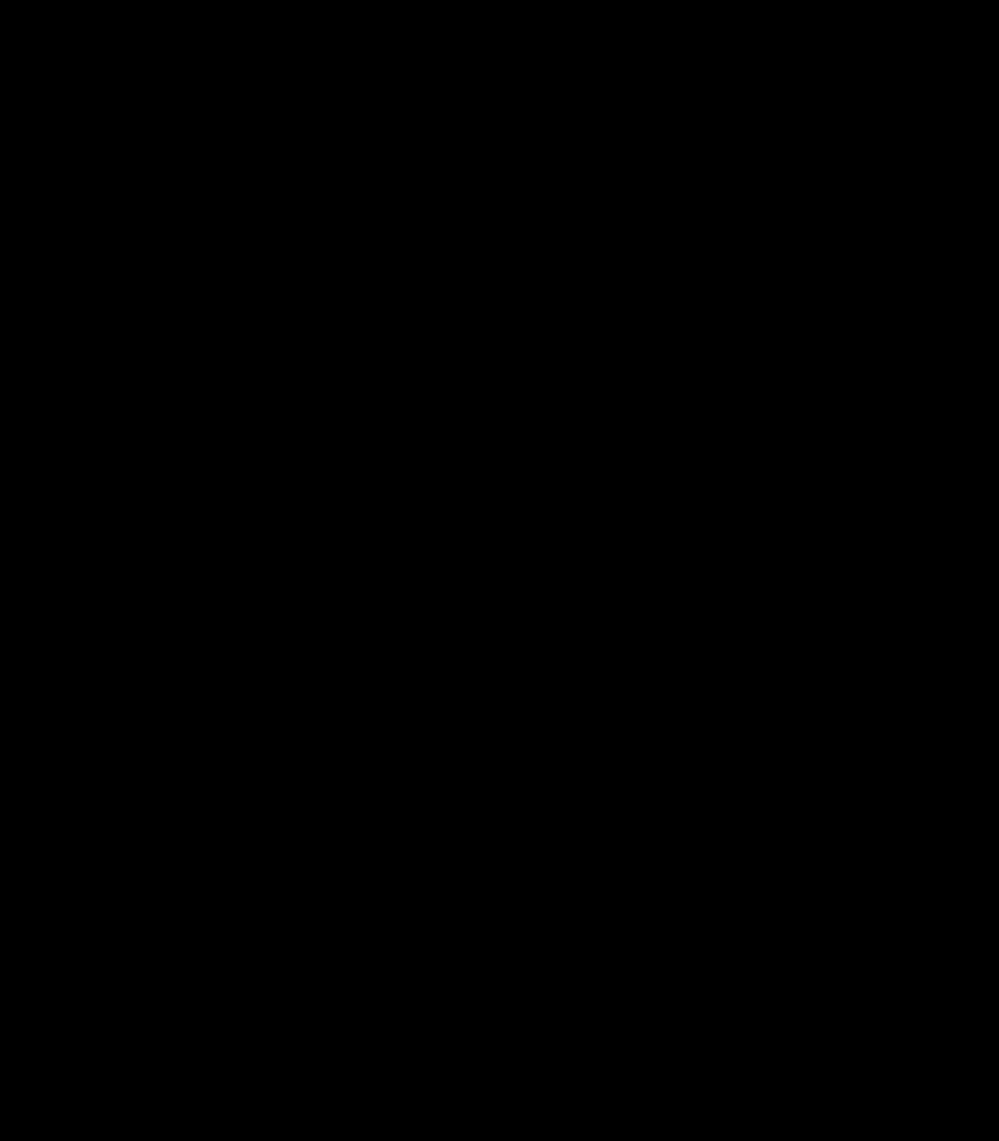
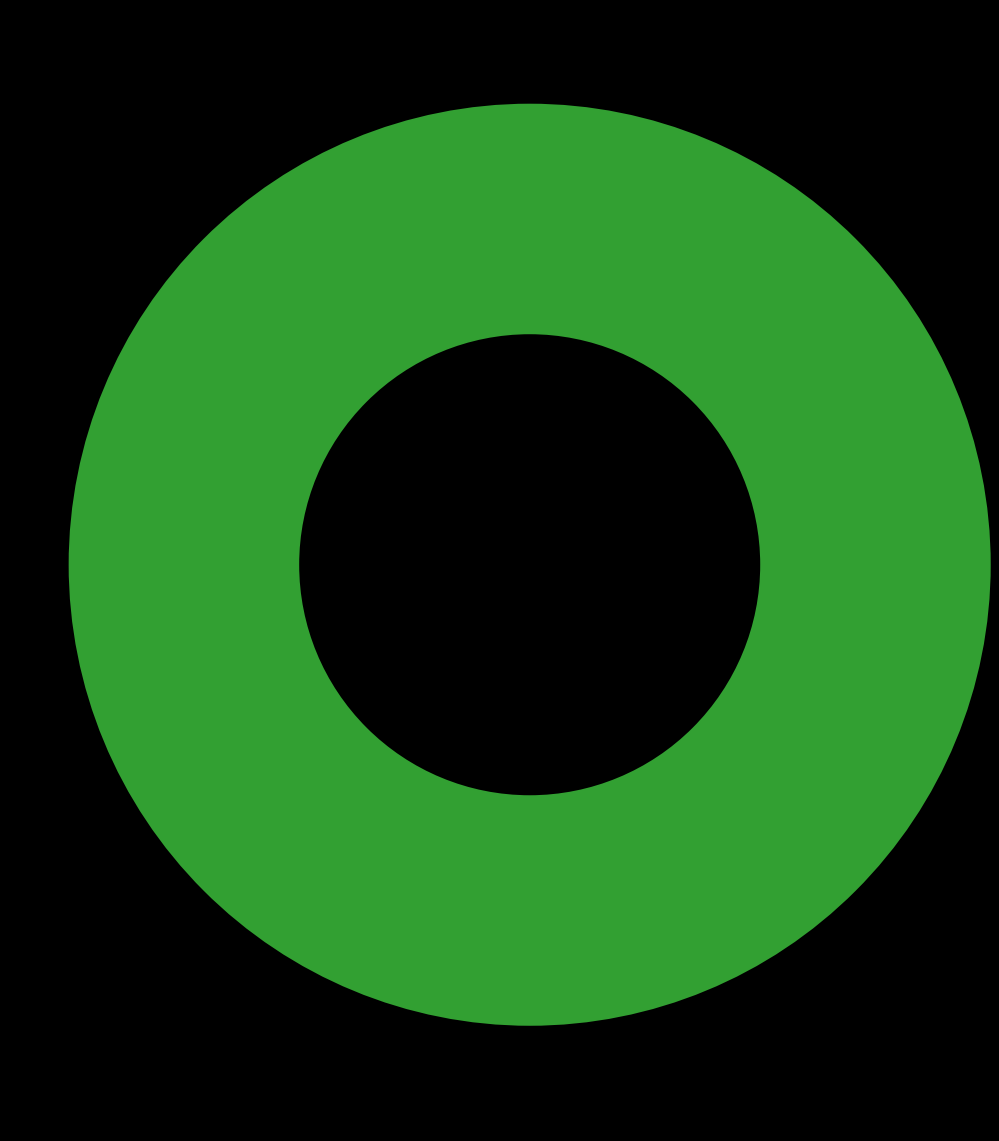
part: none -> (529, 564)

